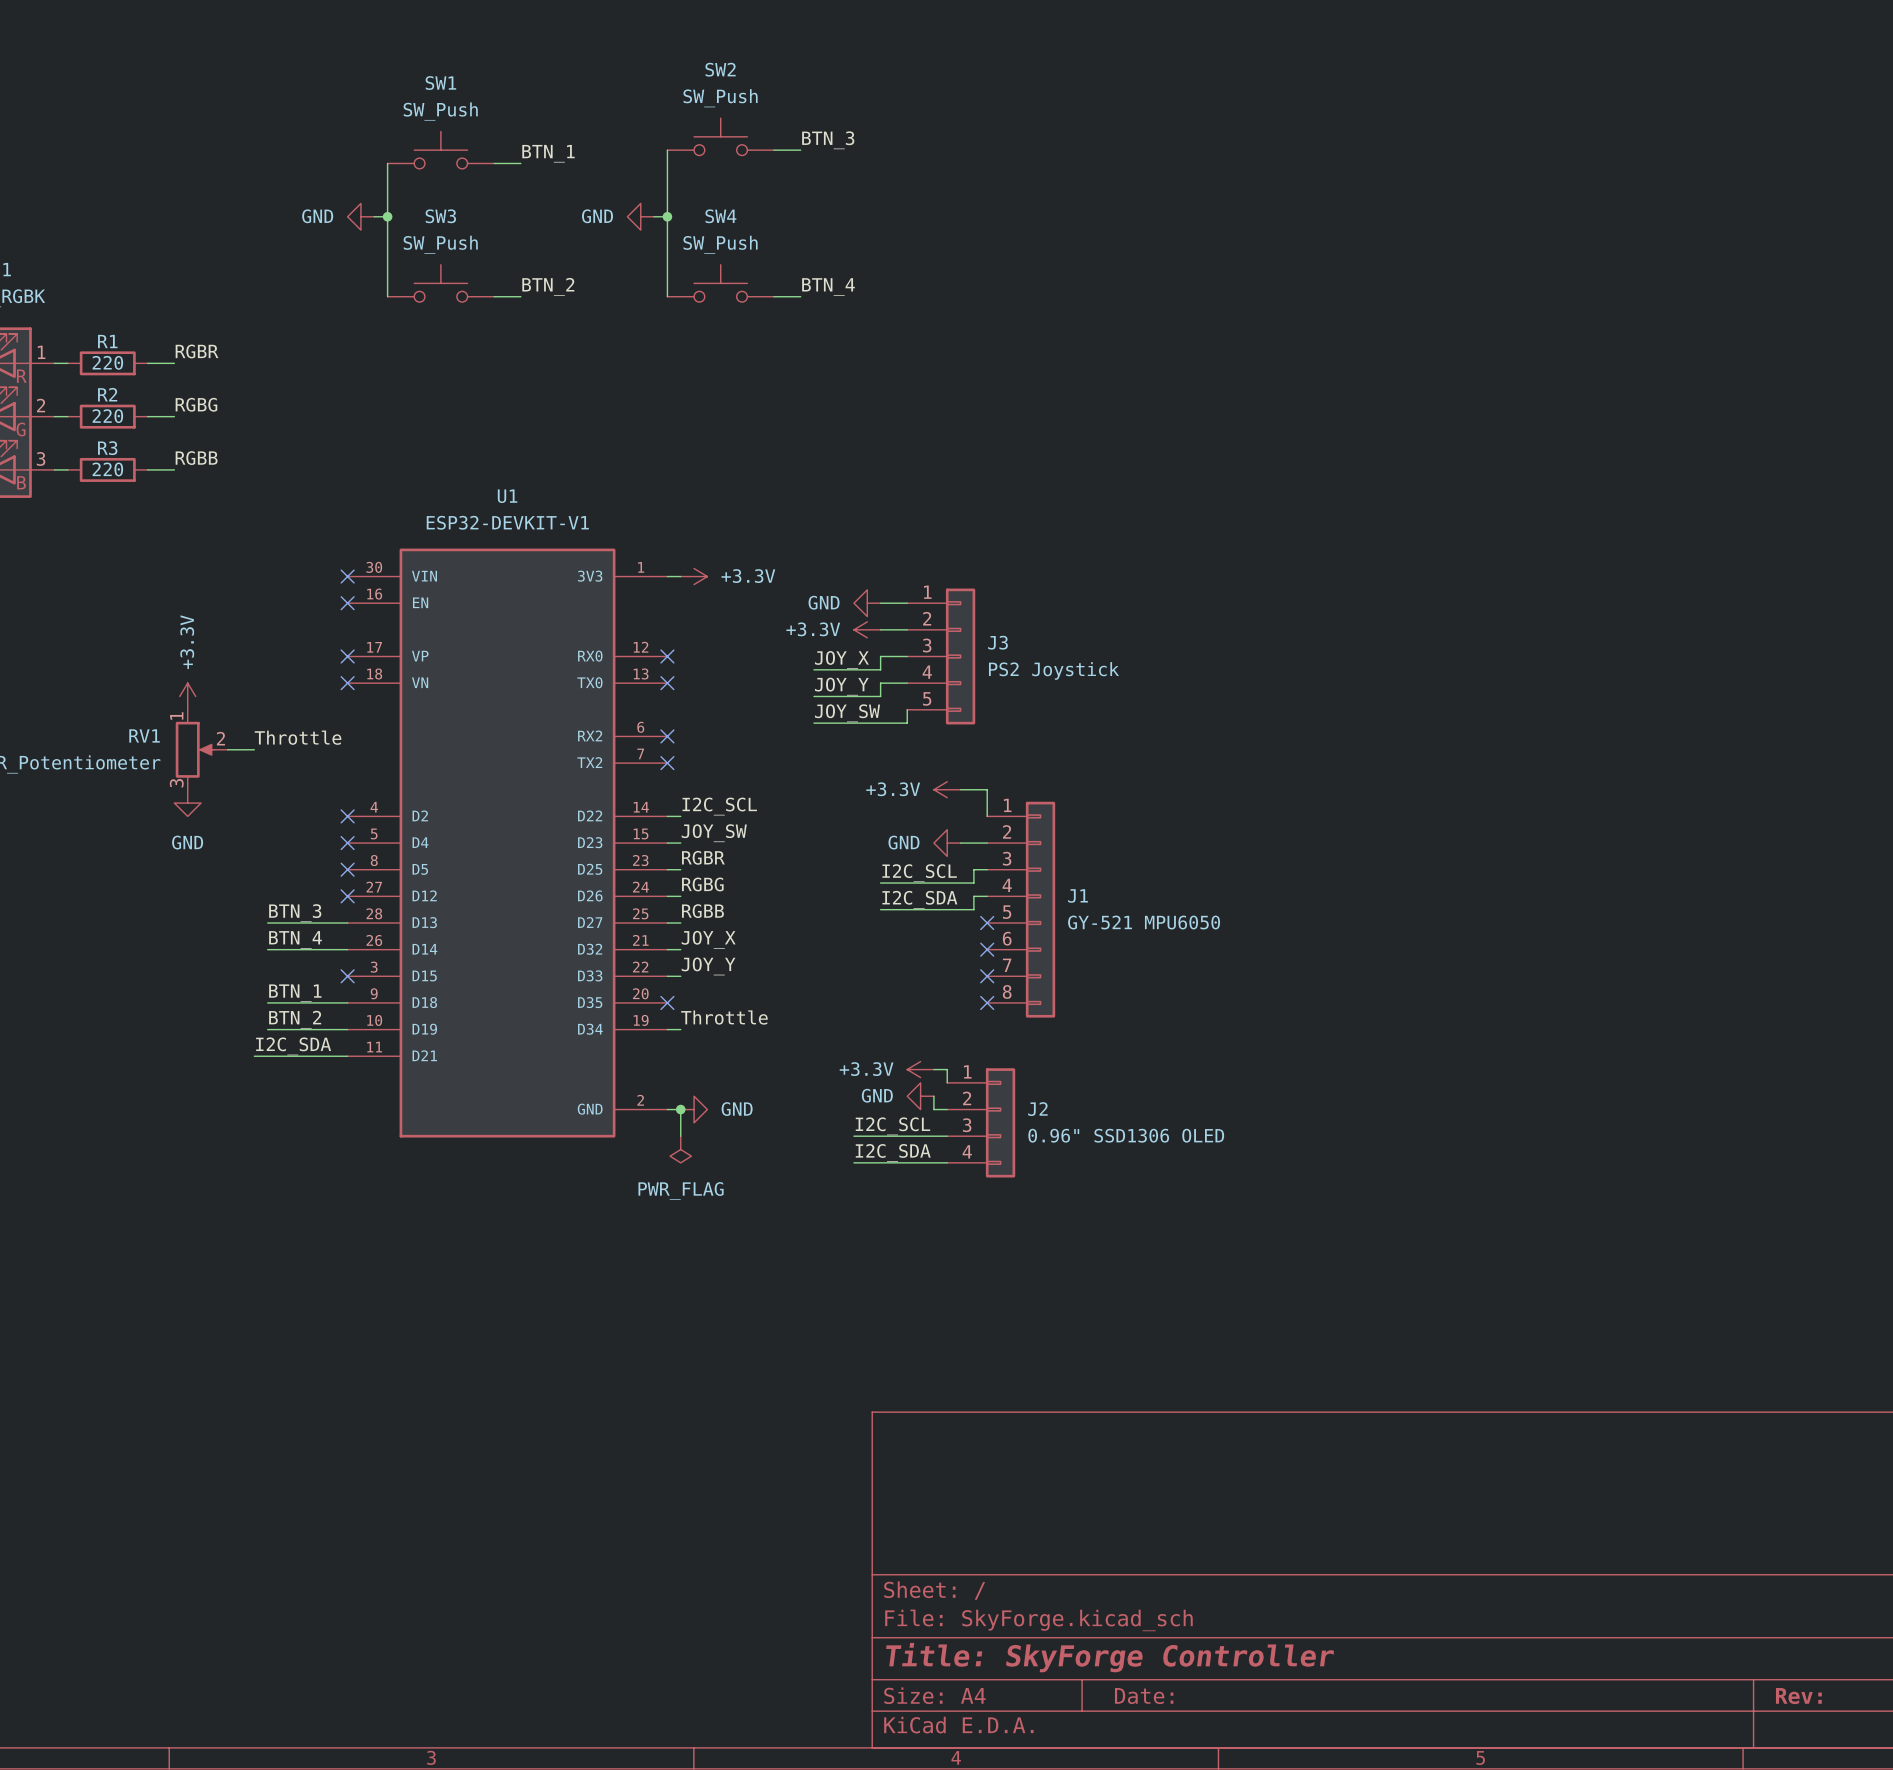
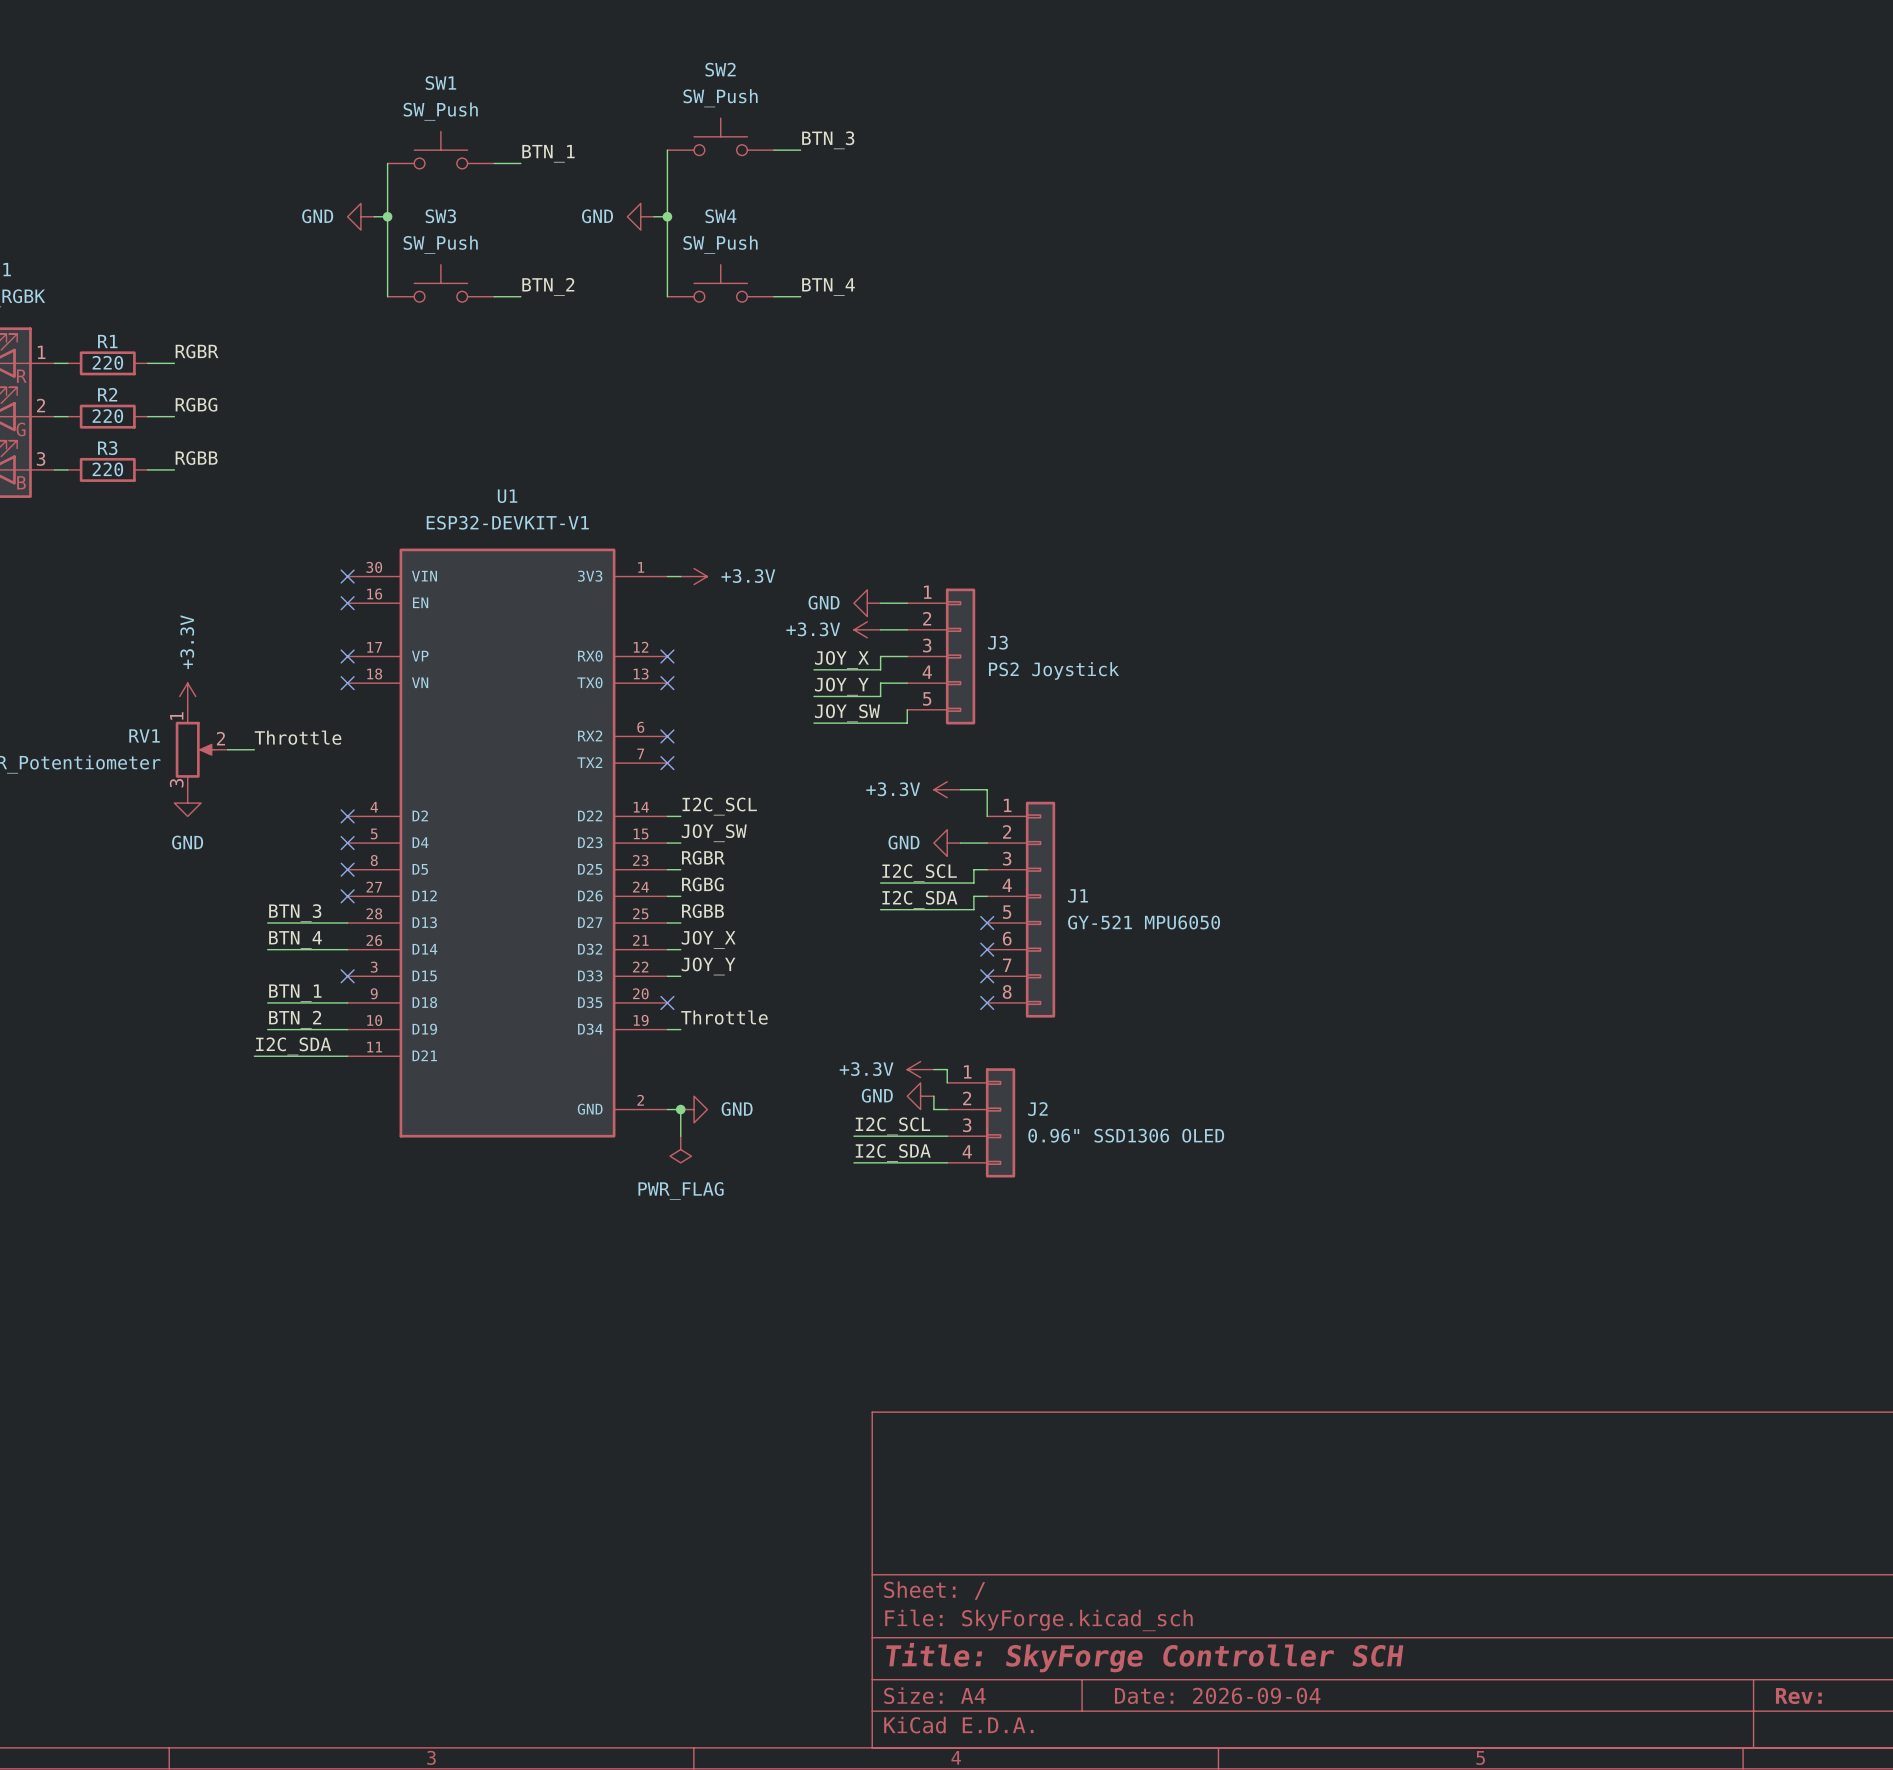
title block: Title: SkyForge Controller (1110, 1657) -> Title: SkyForge Controller SCH (1144, 1657)
title block: Date: (1144, 1696) -> Date: 2026-09-04 (1217, 1695)

